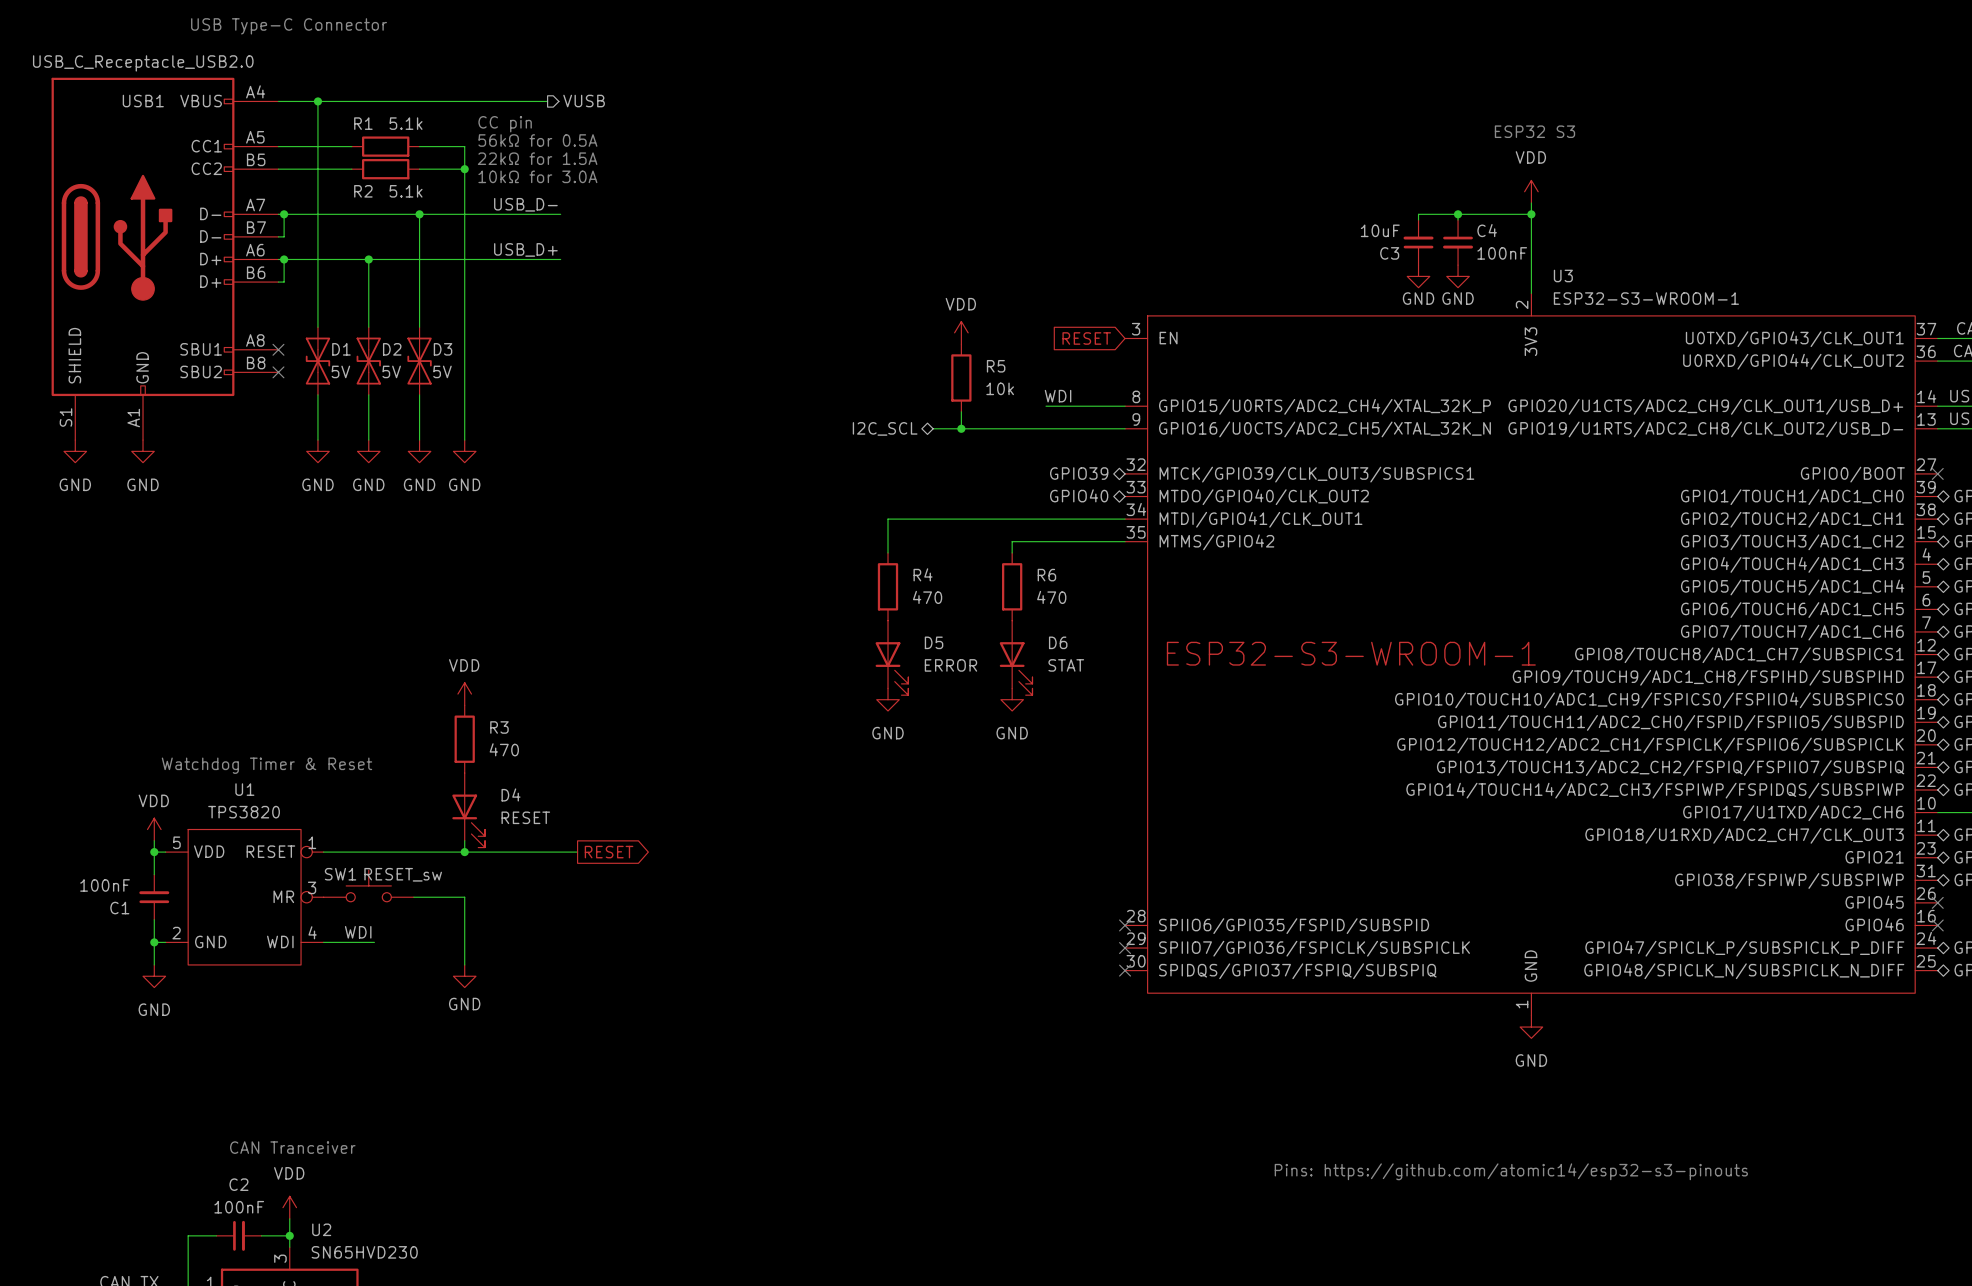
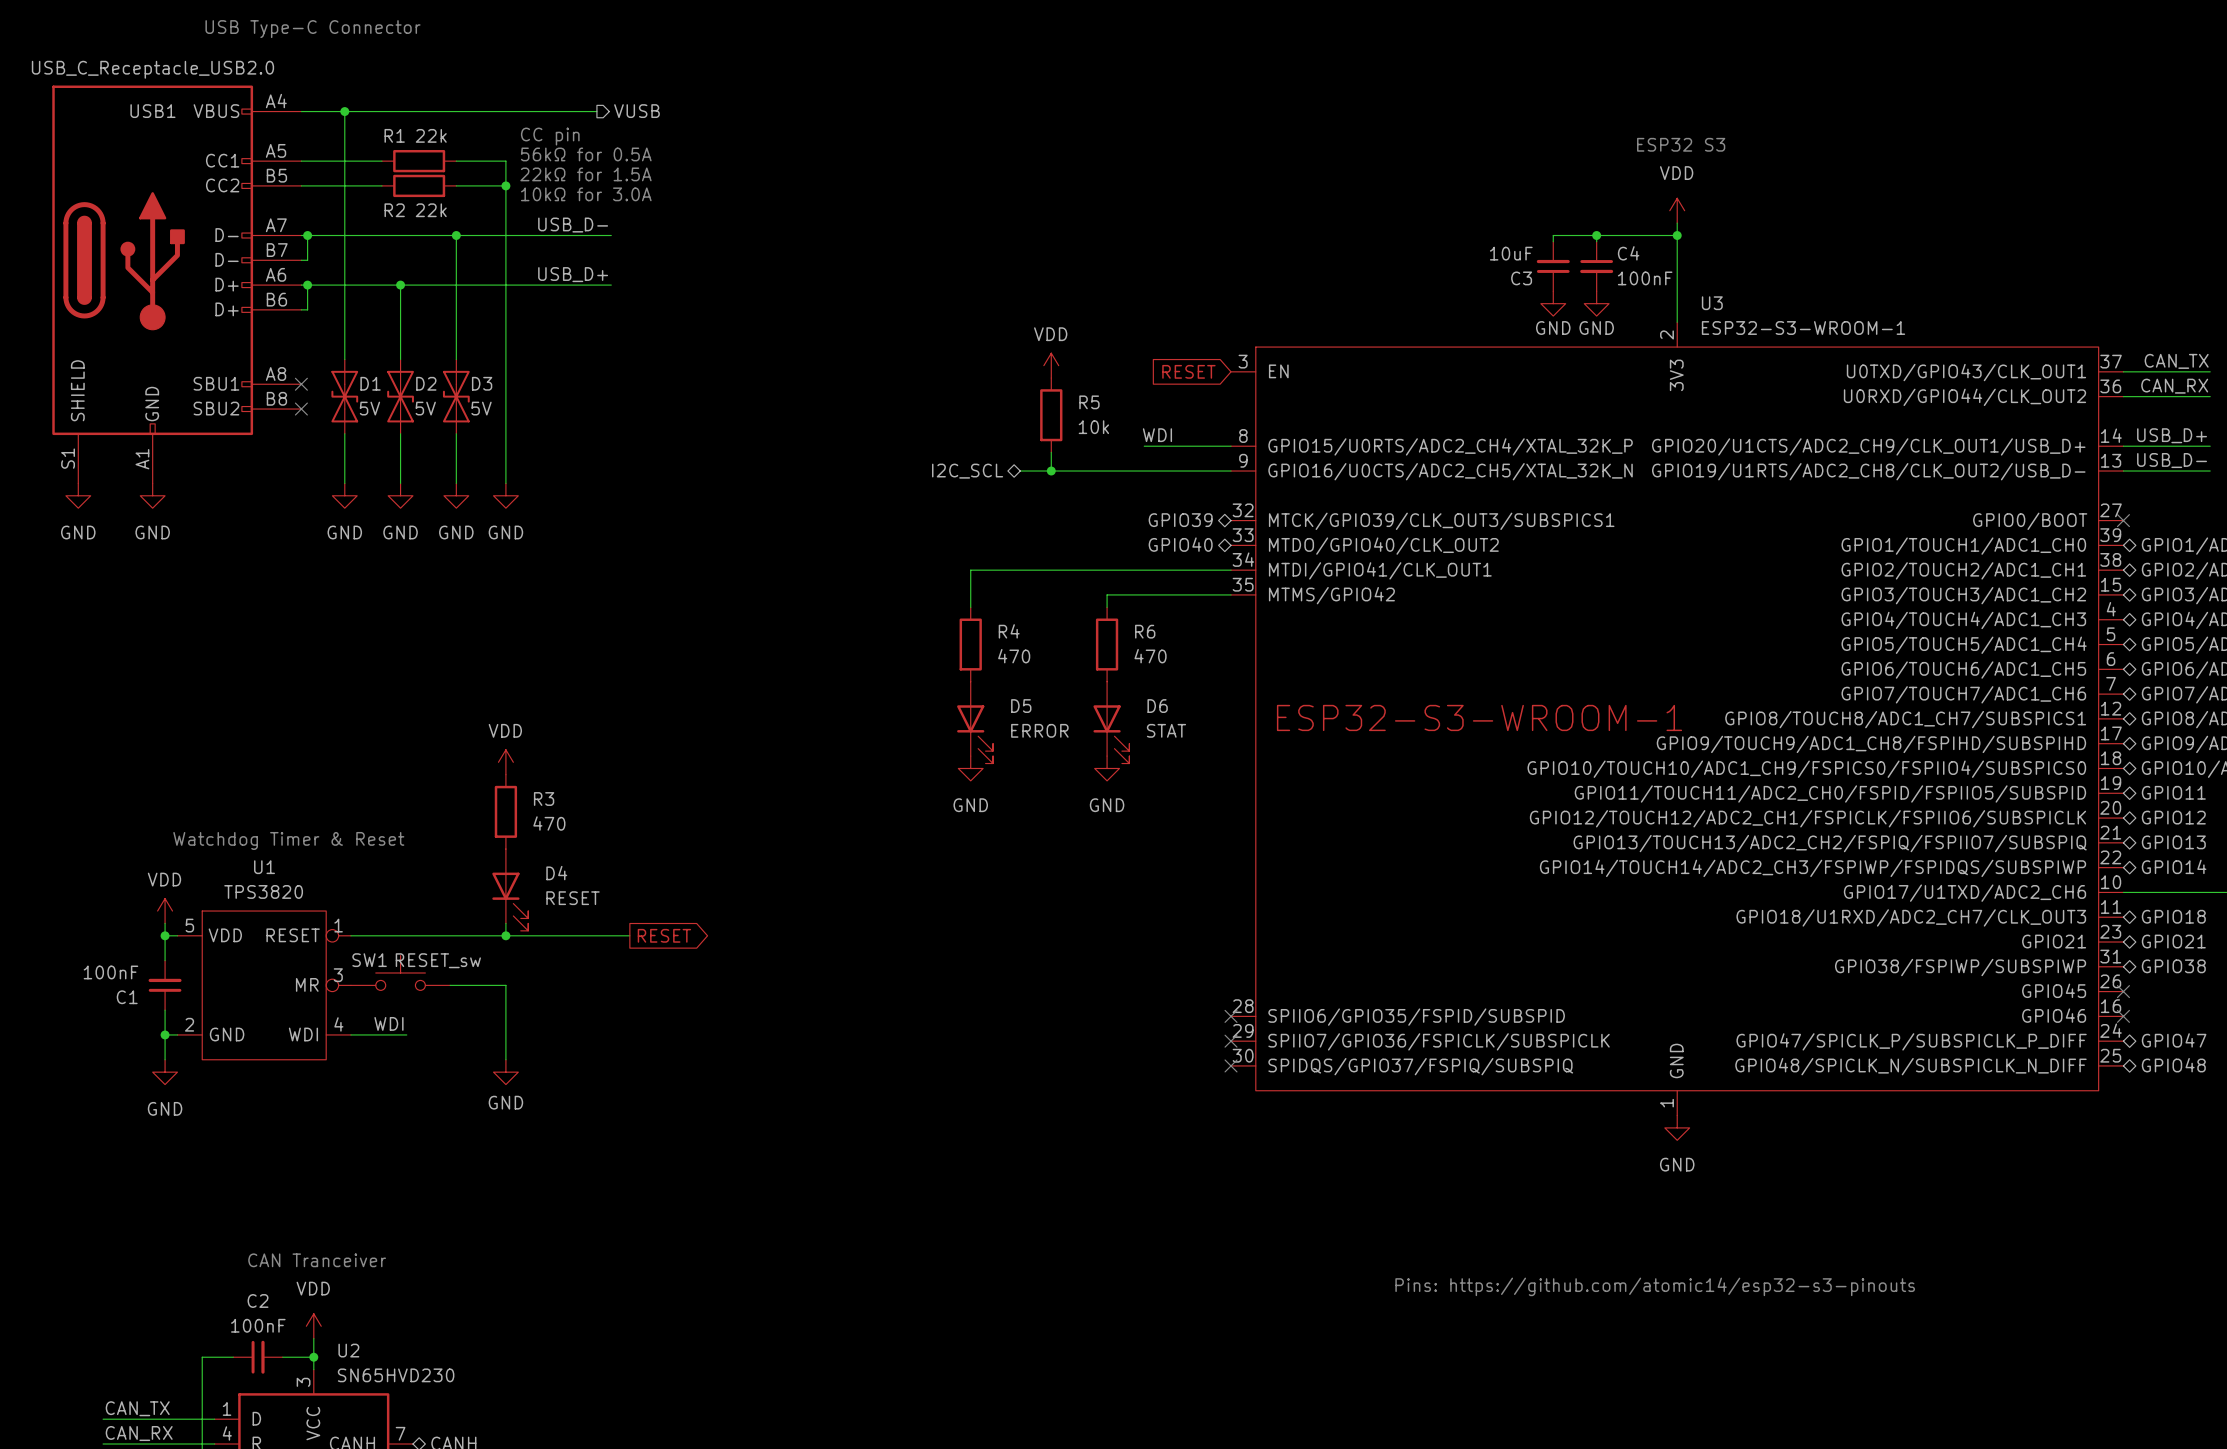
R1 value: 5.1k (406, 123) -> 22k (431, 135)
R2 value: 5.1k (406, 191) -> 22k (431, 210)

